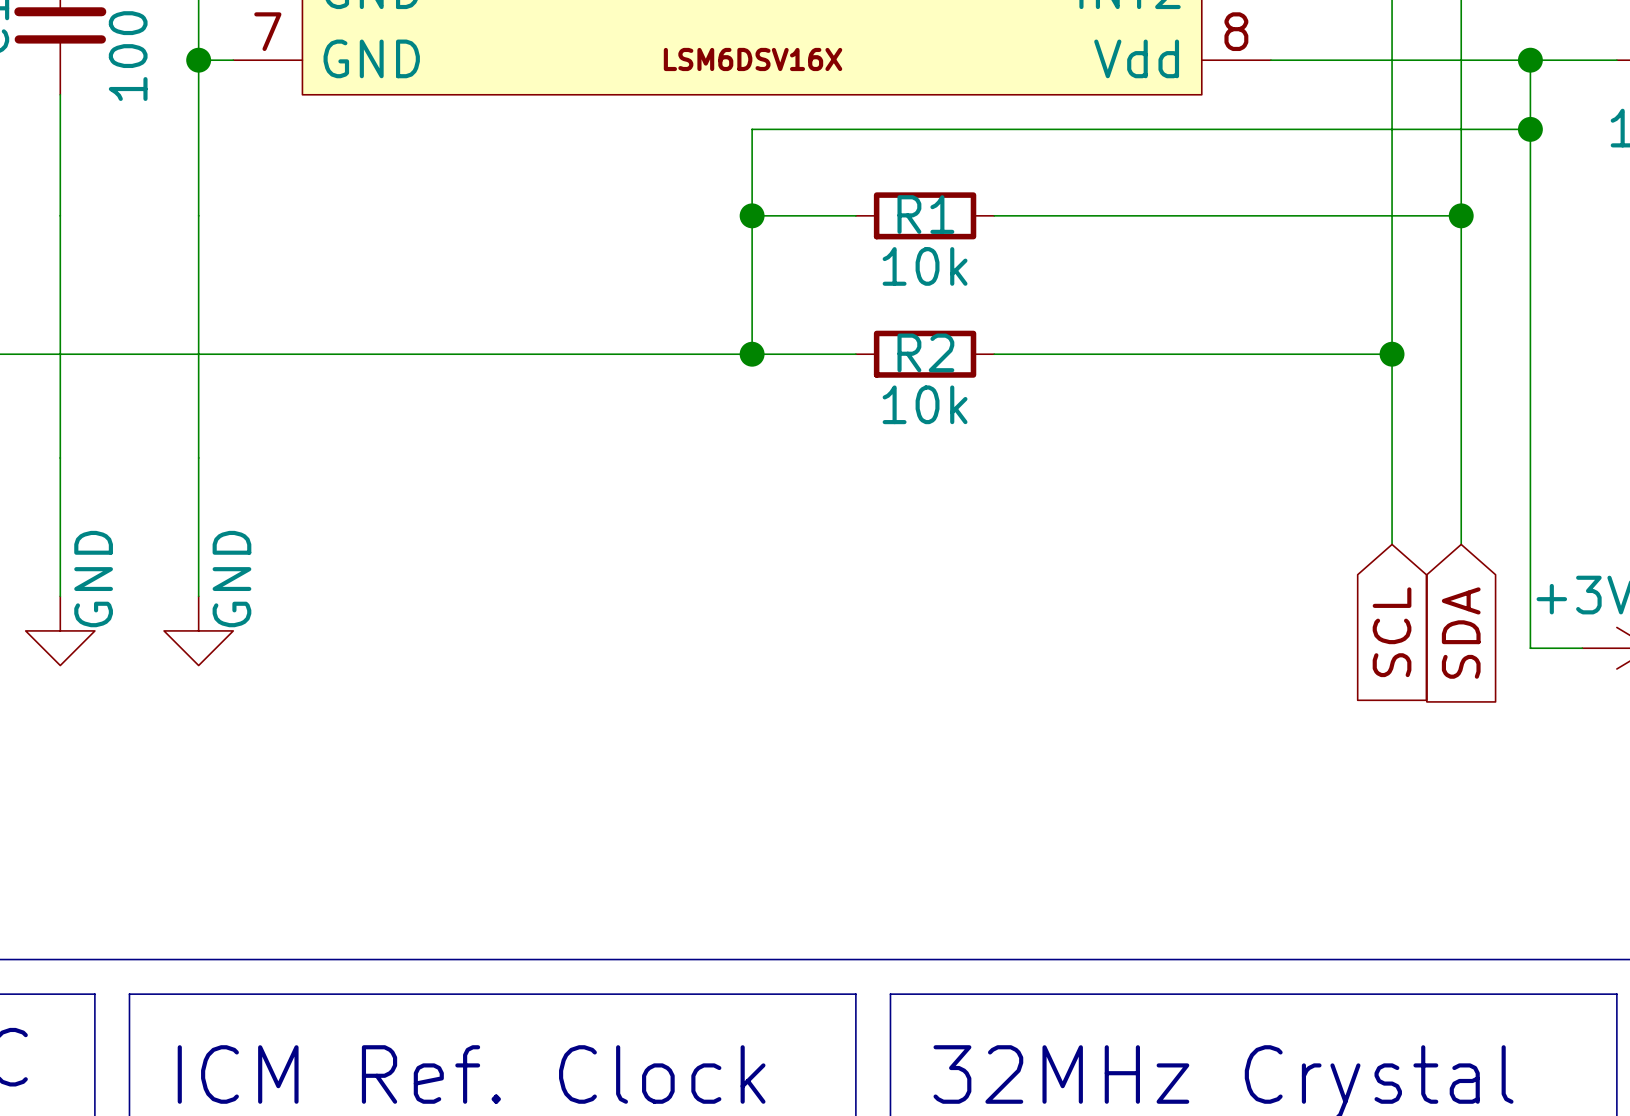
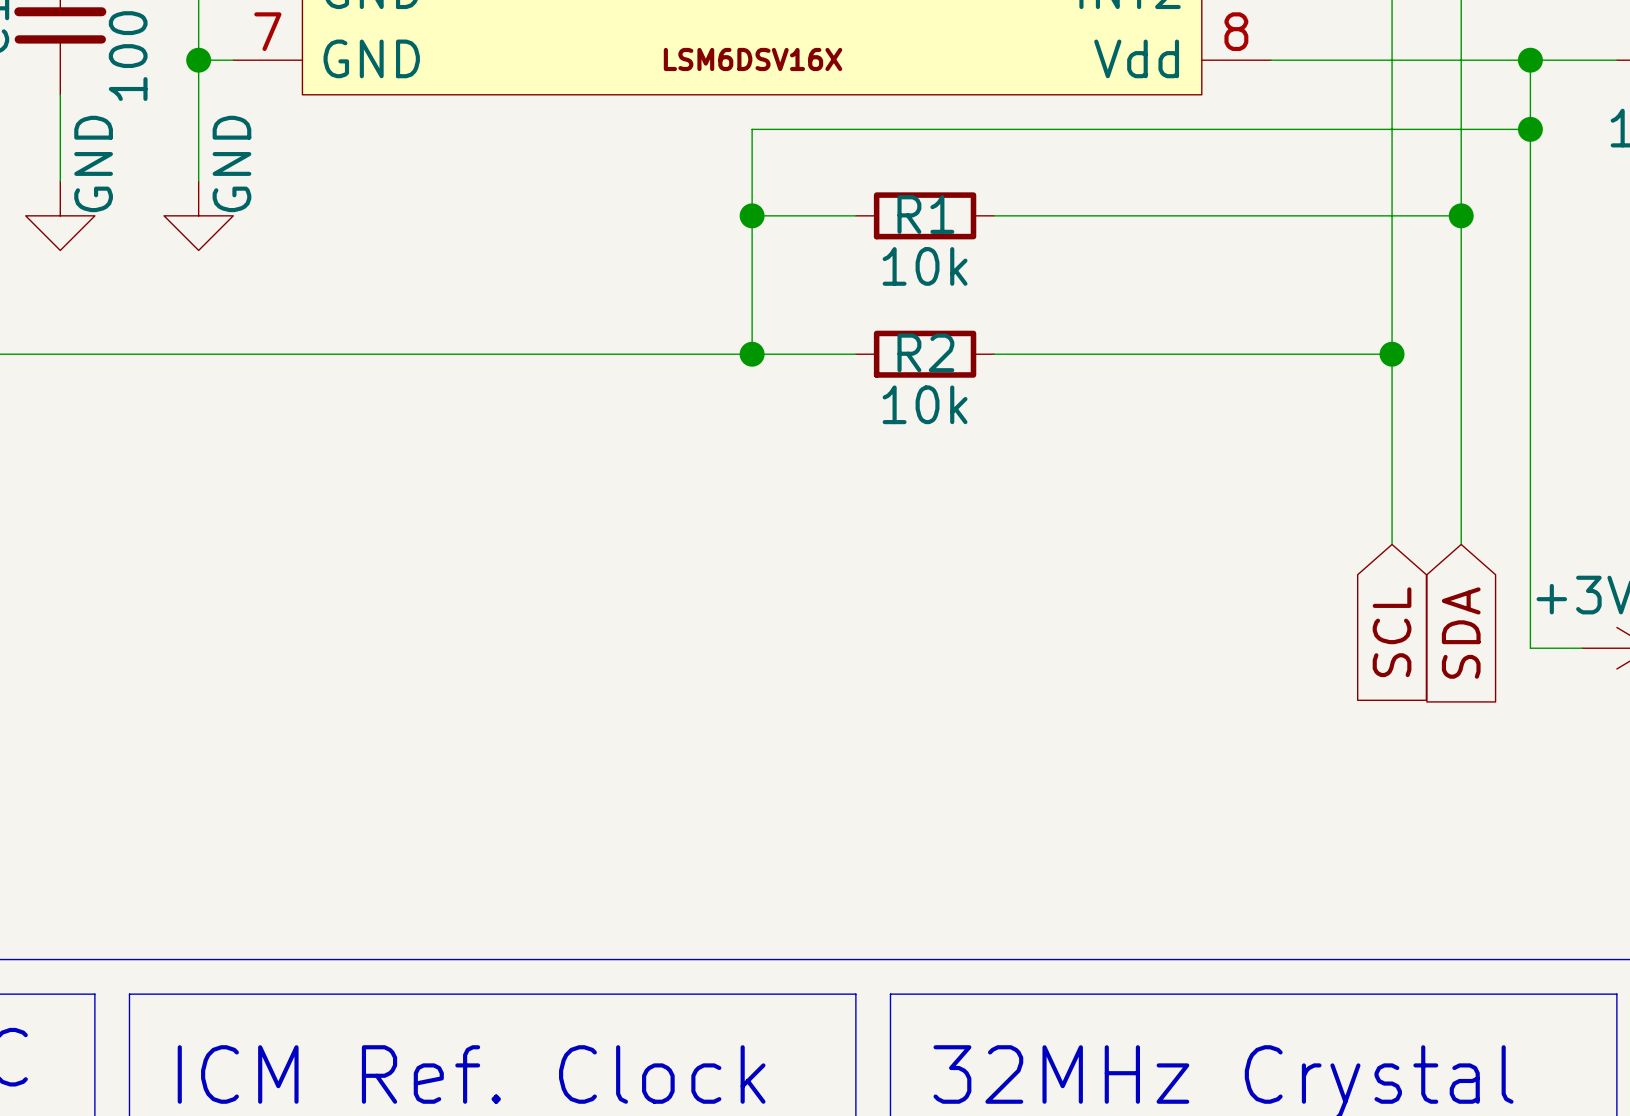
wire: (60, 181) (60, 596) -> none
wire: (198, 181) (198, 596) -> none
power symbol: none -> GND (60, 215)
power symbol: none -> GND (198, 215)
power symbol: GND (60, 630) -> none
power symbol: GND (198, 630) -> none

